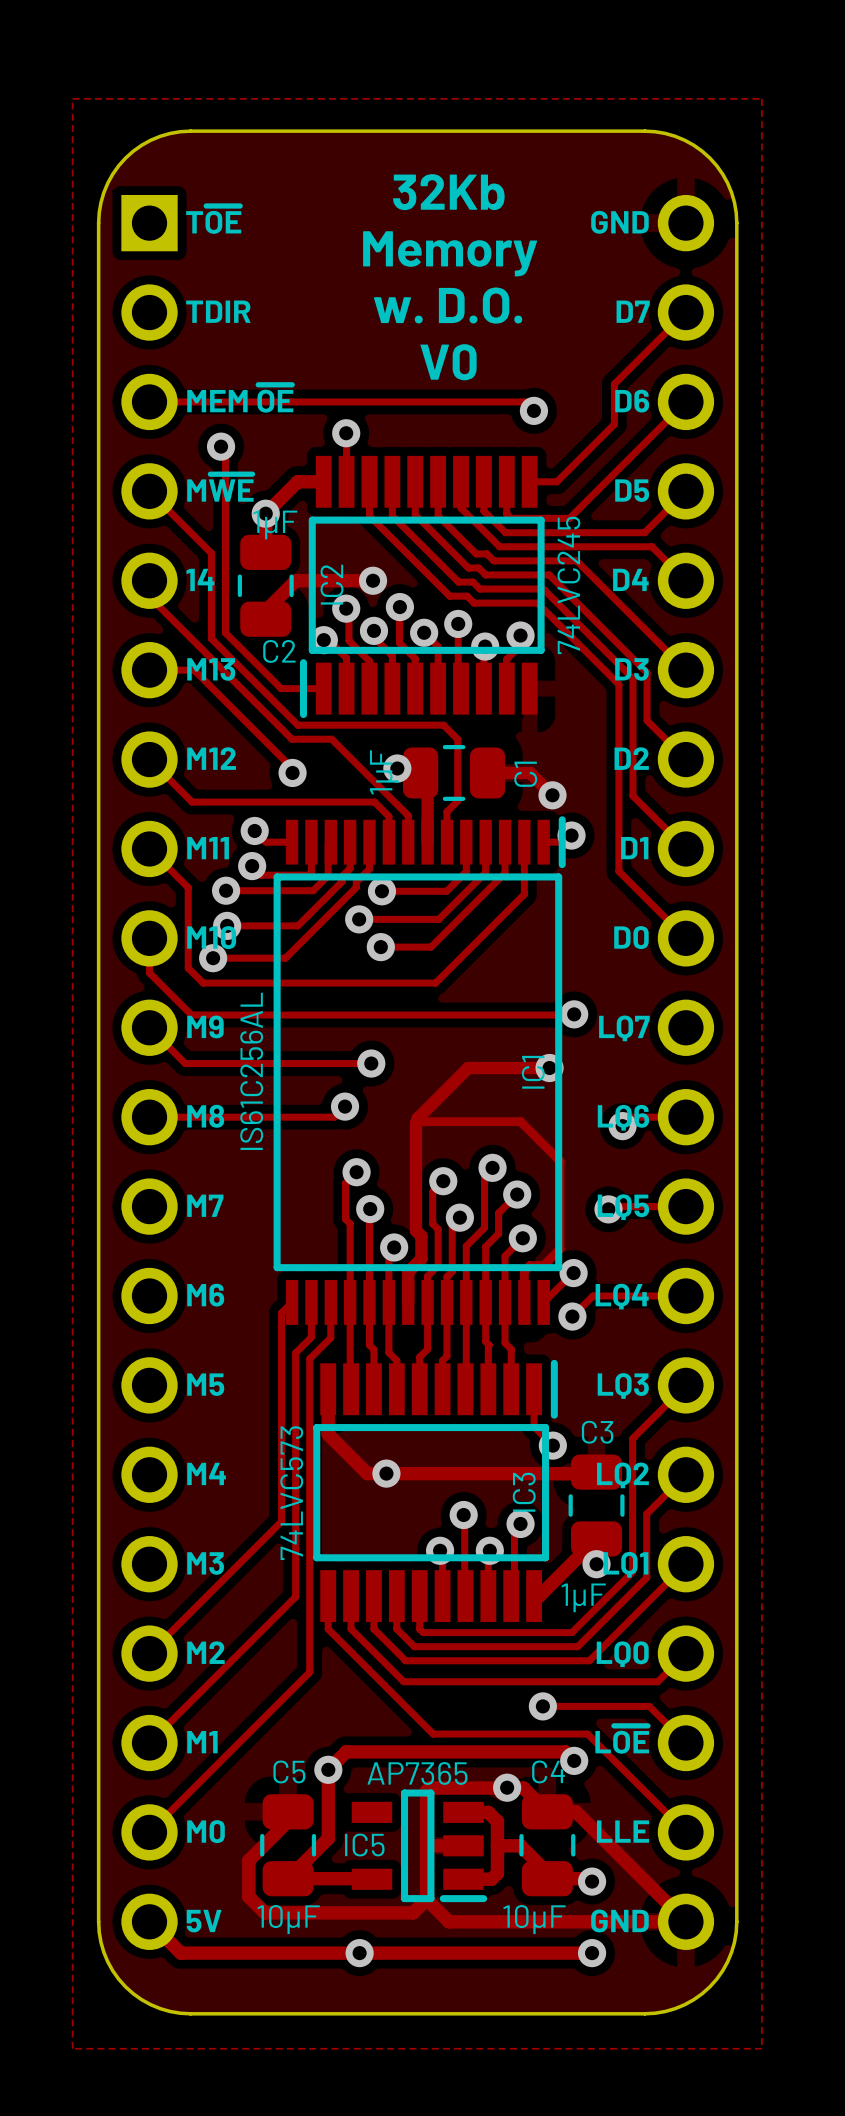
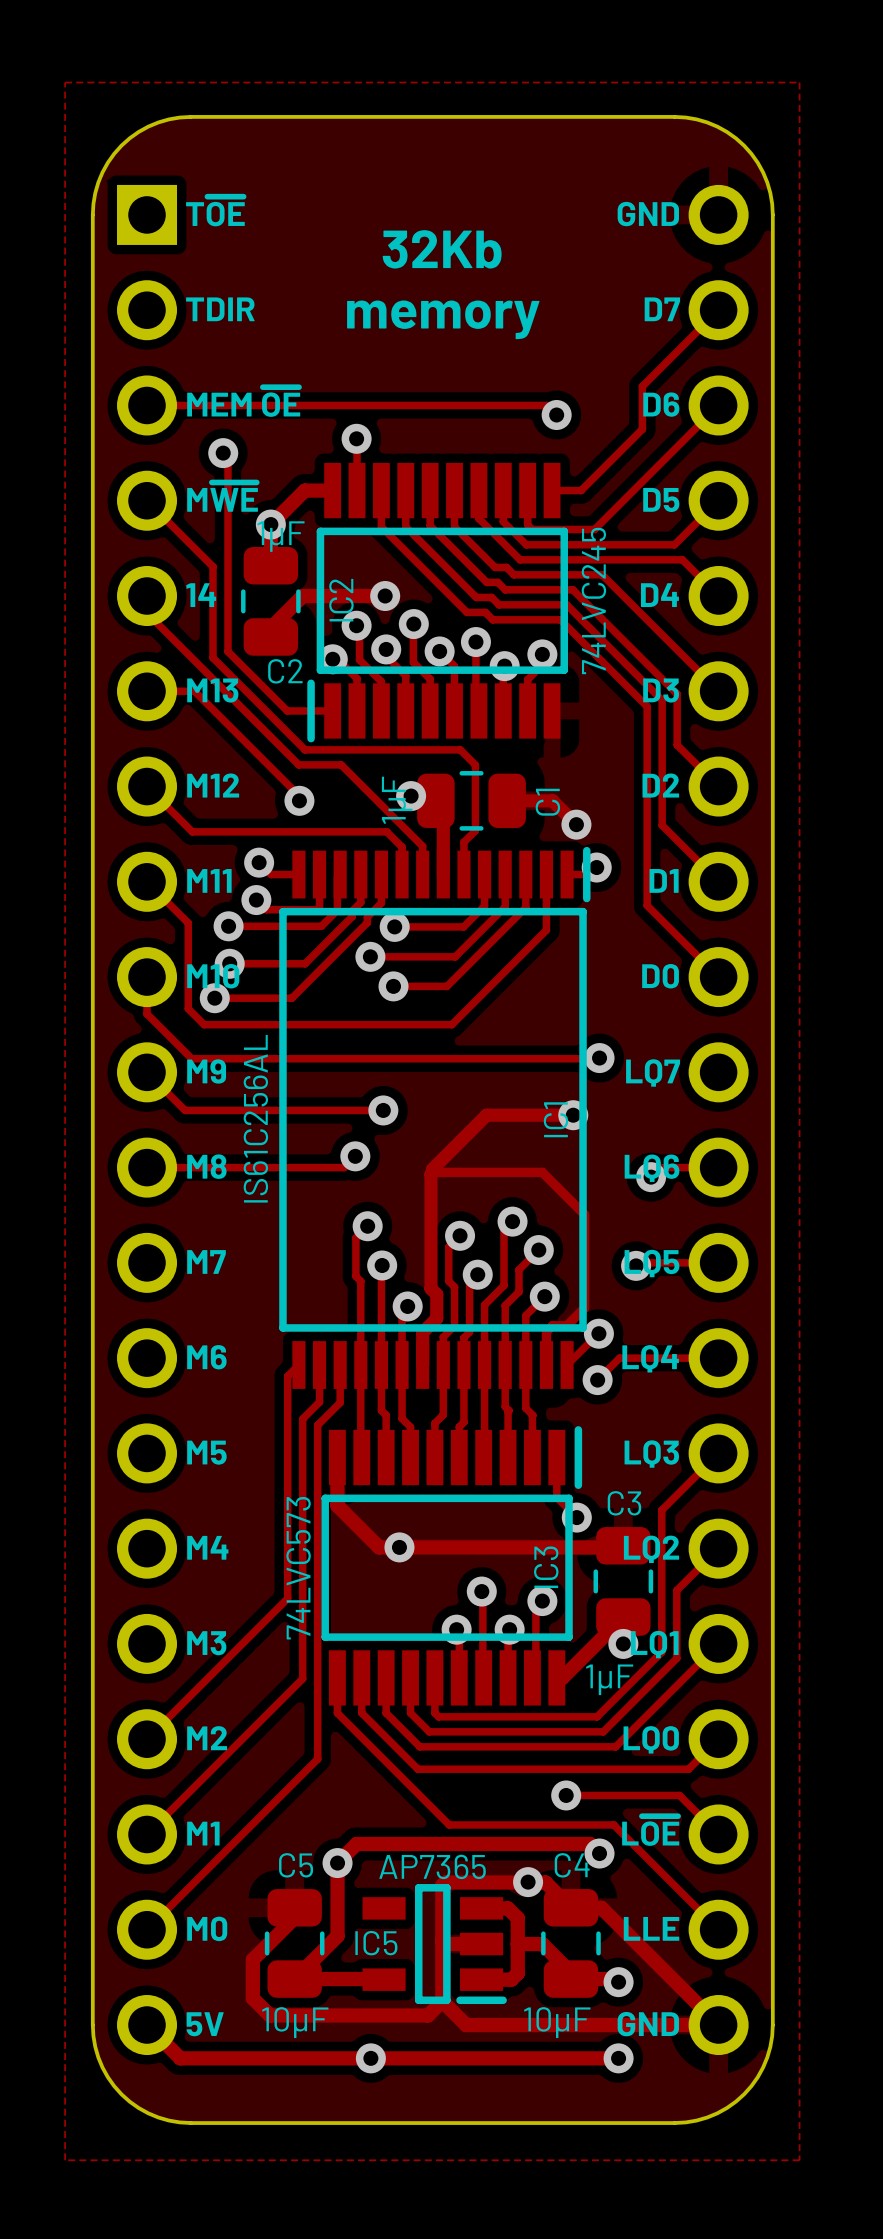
text position: 32Kb (448, 192) -> 32Kb (442, 249)
text: Memory (450, 253) -> none
text: w. D.O. (448, 305) -> memory (443, 319)
text: V0 (448, 362) -> none

